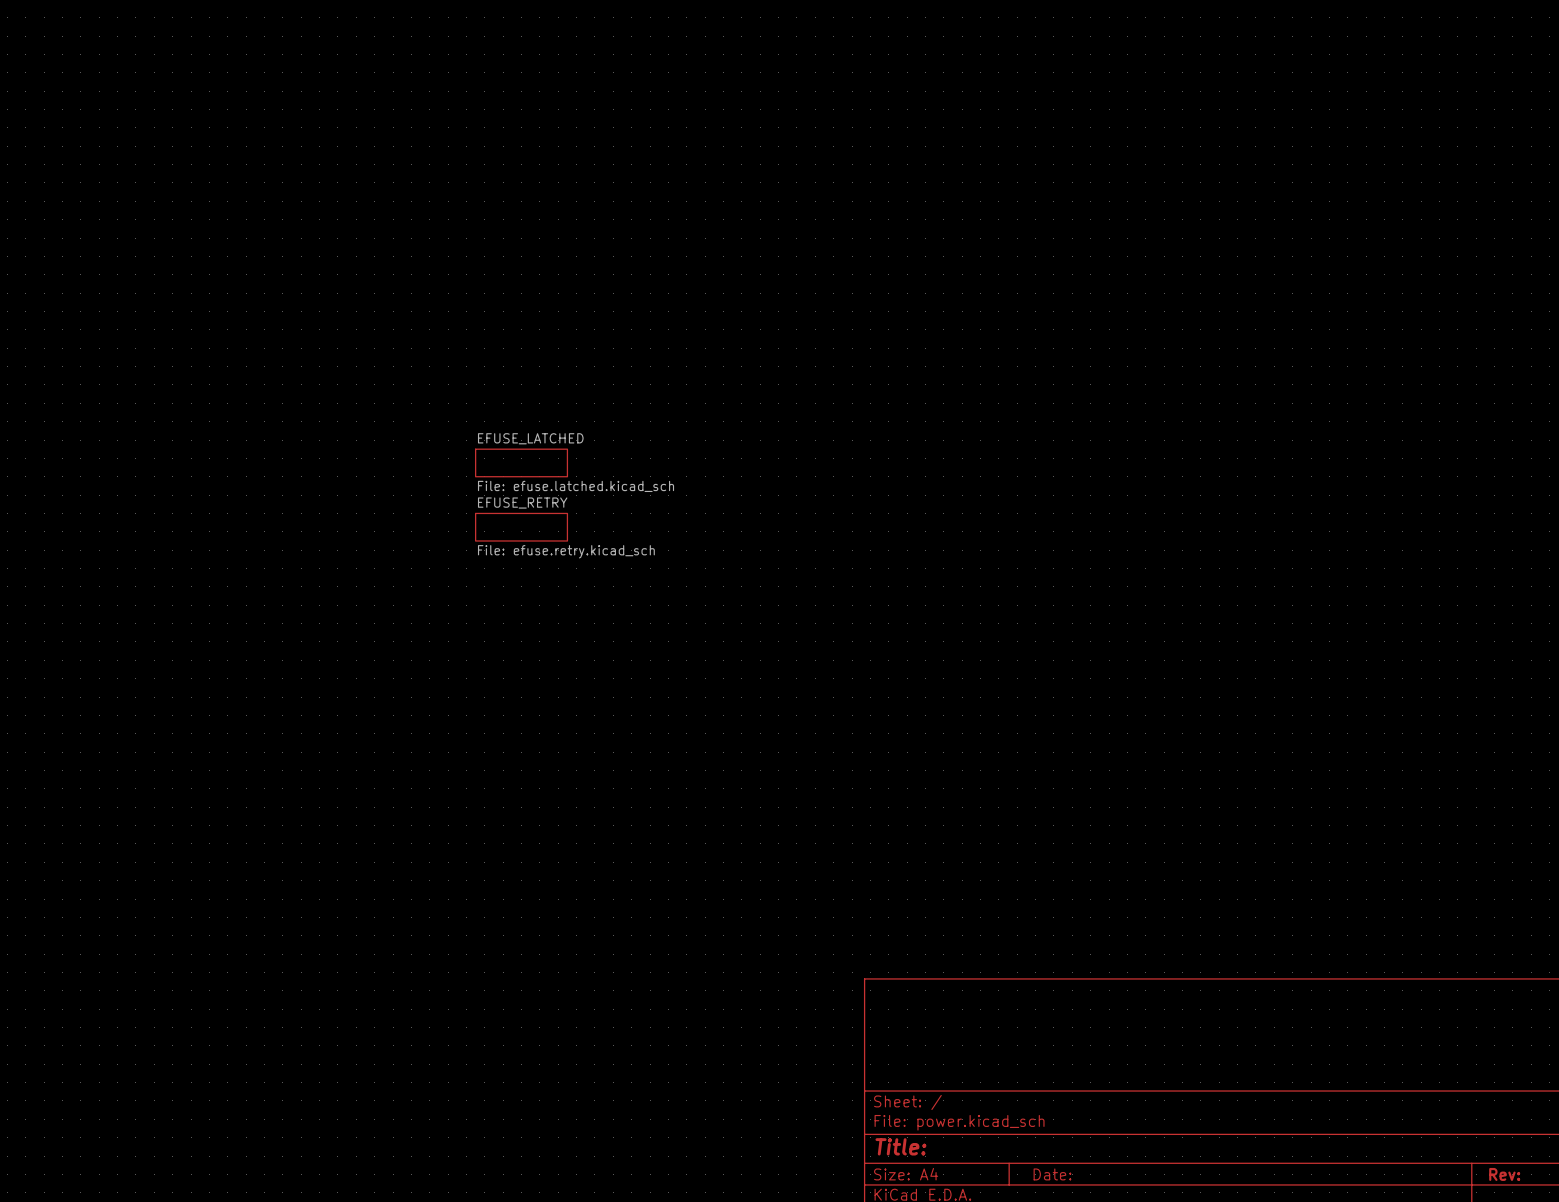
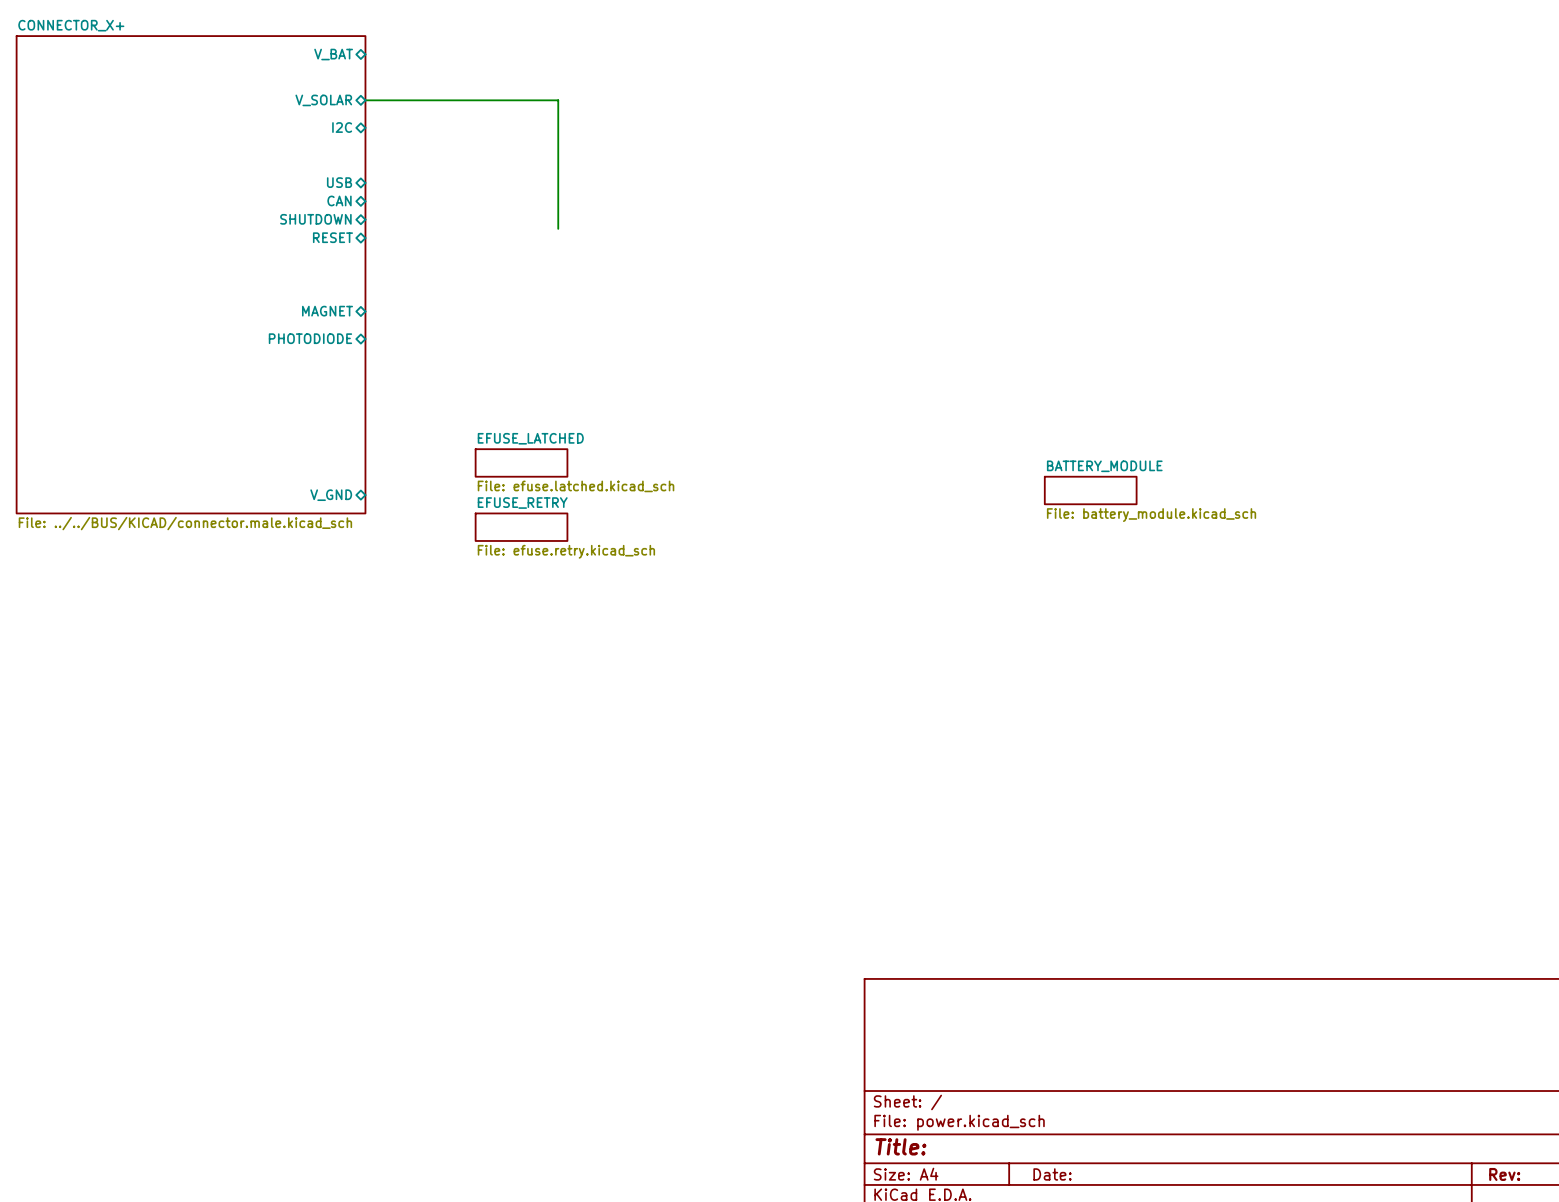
sheet pin: none -> V_BAT (333, 54)
sheet pin: none -> V_SOLAR (323, 100)
wire: none -> (365, 100) (558, 100) (558, 228)
sheet pin: none -> I2C (342, 127)
sheet pin: none -> USB (339, 182)
sheet pin: none -> CAN (339, 200)
sheet pin: none -> SHUTDOWN (315, 219)
sheet pin: none -> RESET (332, 237)
sheet CONNECTOR_X+: none -> File: ../../BUS/KICAD/connector.male.kicad_sch (191, 274)
sheet pin: none -> MAGNET (327, 311)
sheet pin: none -> PHOTODIODE (310, 338)
sheet BATTERY_MODULE: none -> File: battery_module.kicad_sch (1090, 490)
sheet pin: none -> V_GND (331, 495)

